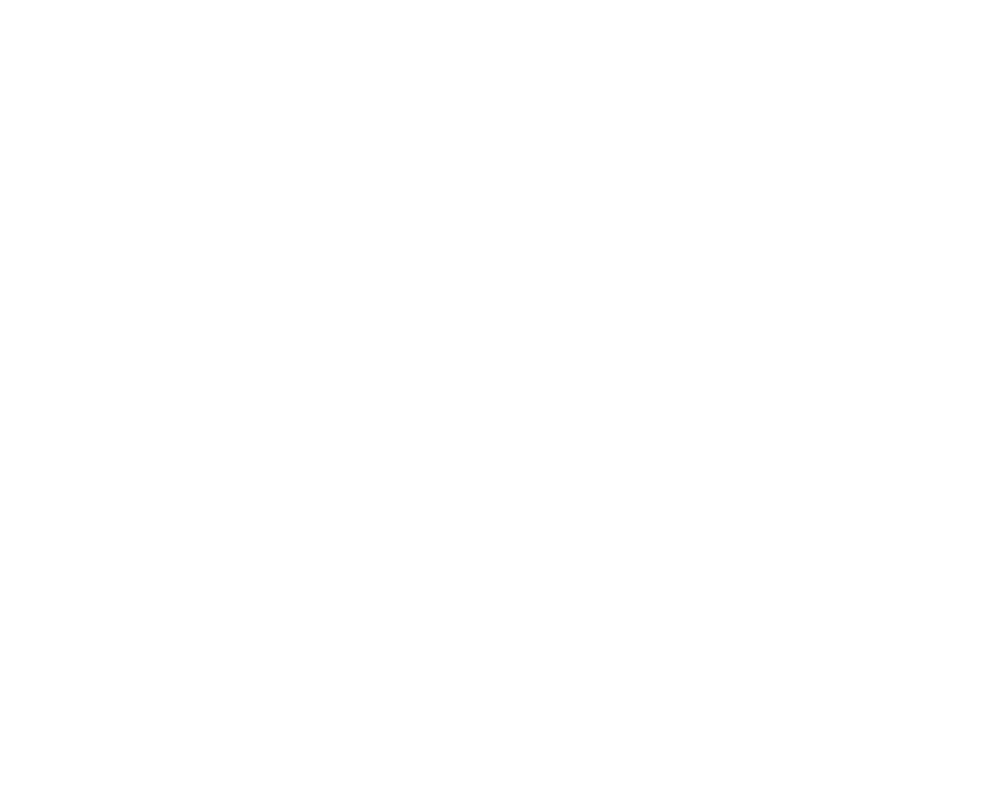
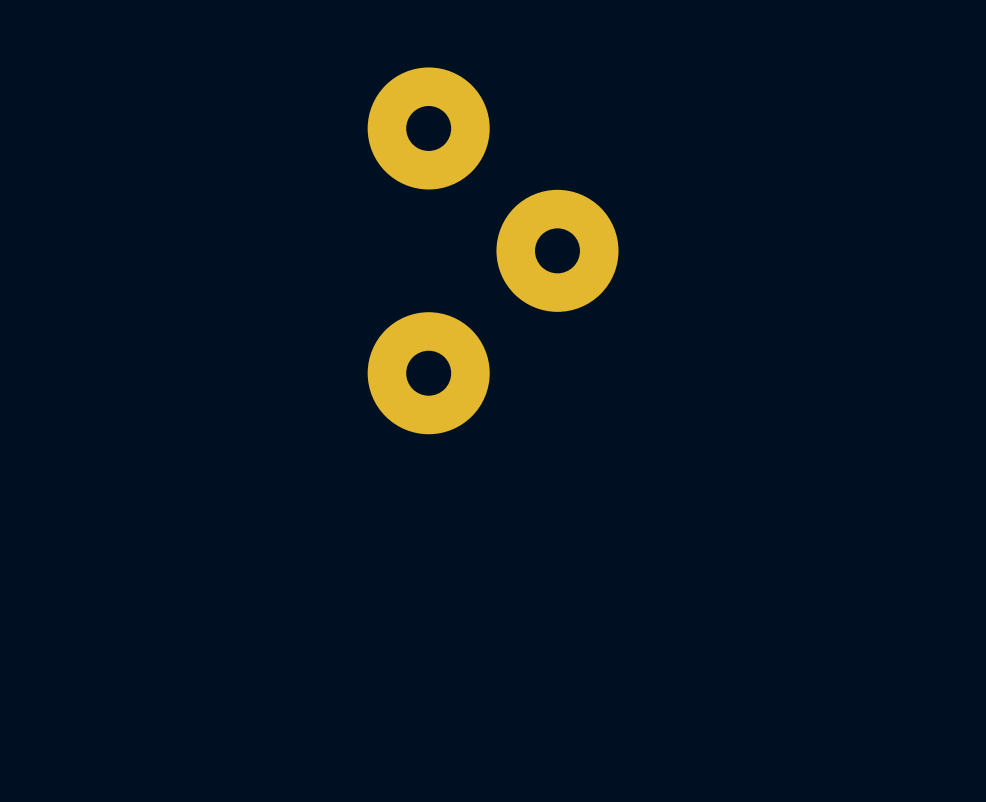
part: none -> (493, 250)

